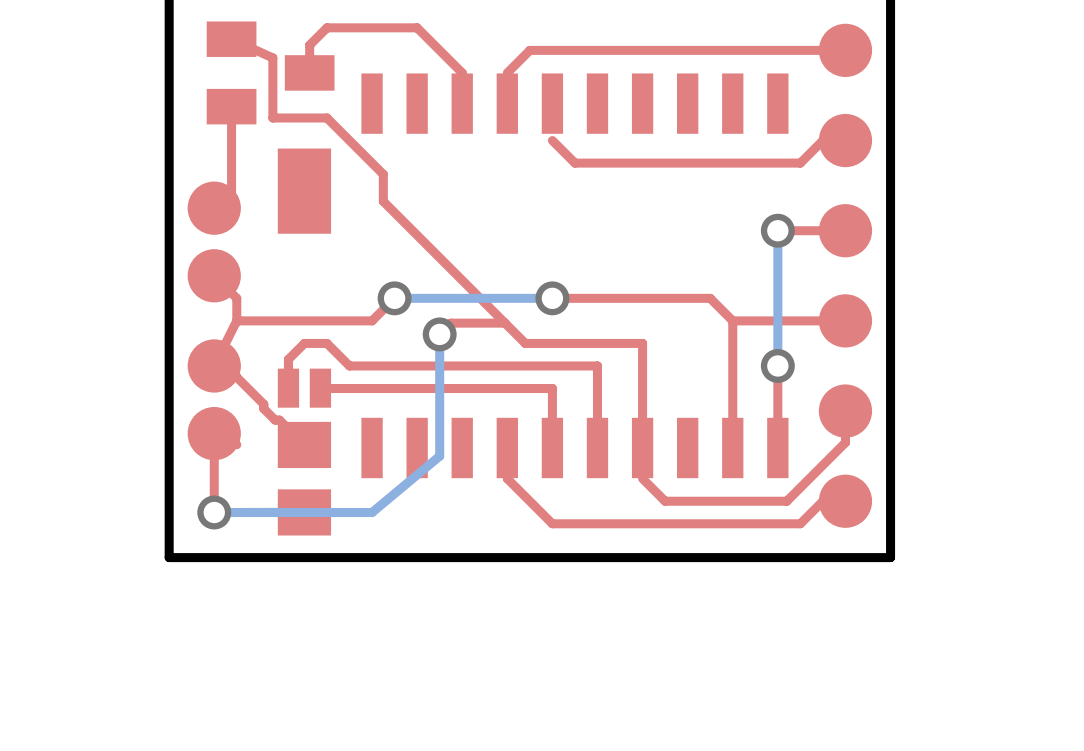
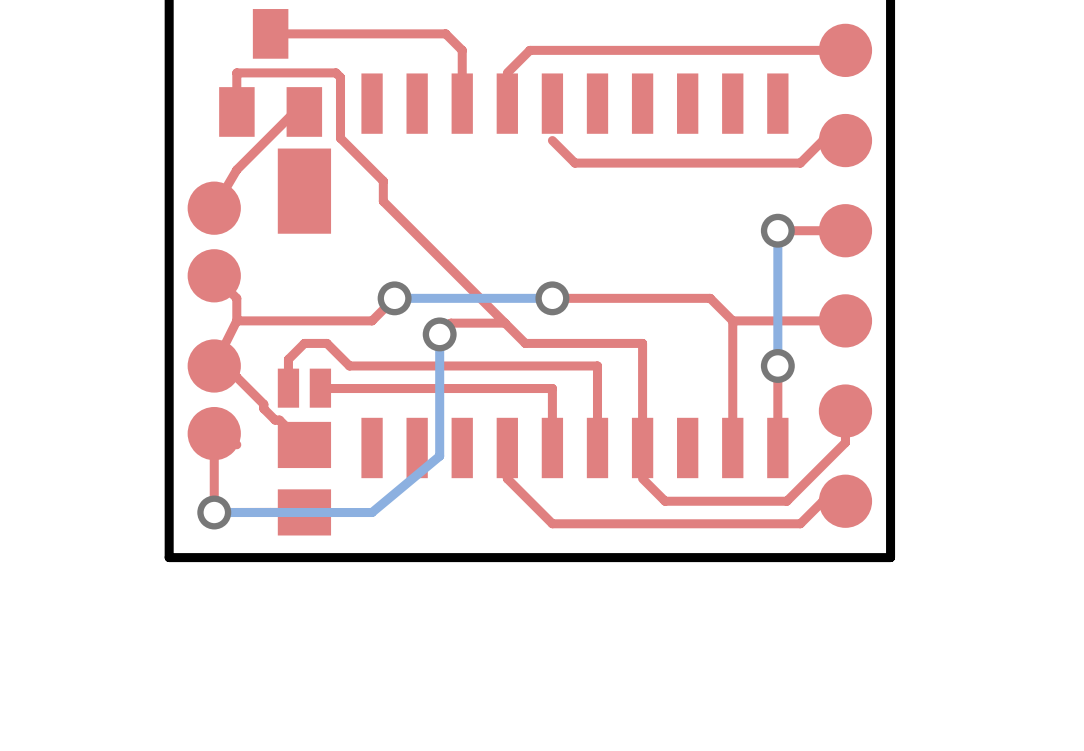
top track: (231, 39) (272, 57) (272, 118) (326, 118) (383, 174) (383, 181) -> (236, 111) (236, 72) (335, 72) (340, 77) (340, 138) (383, 181)
part rotation: 0° (270, 72) -> 90° counterclockwise (270, 72)
top track: (462, 72) (417, 27) (326, 27) (309, 45) (309, 72) -> (462, 72) (462, 50) (445, 33) (270, 33)
top track: (231, 106) (231, 190) (214, 208) -> (304, 111) (294, 111) (236, 169) (214, 208)

